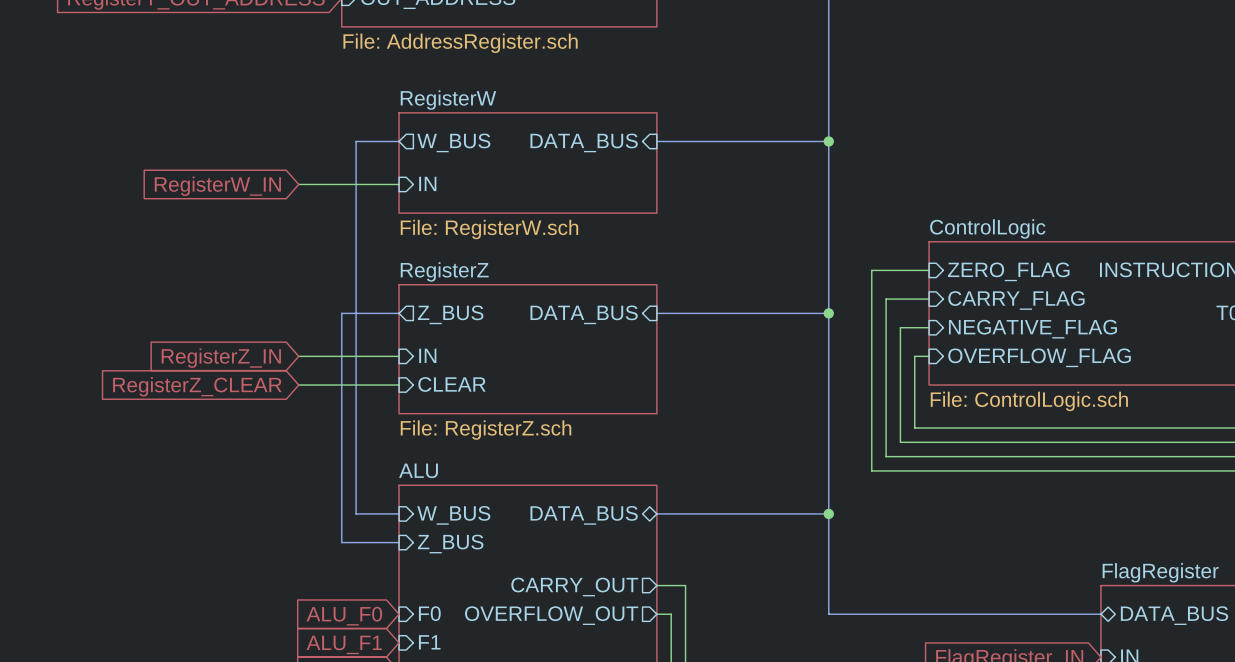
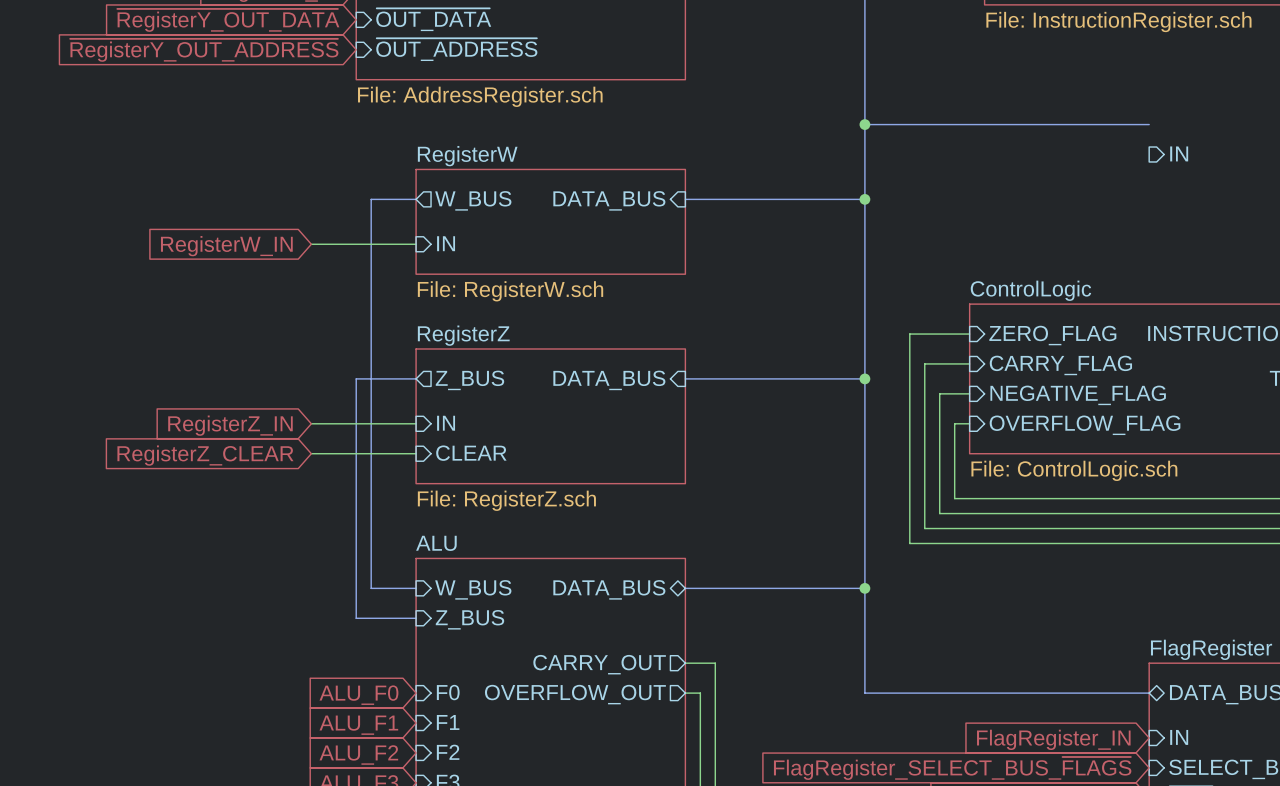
bus: none -> (864, 124) (1149, 124)
junction: none -> (864, 124)
sheet pin: none -> IN (1179, 153)

